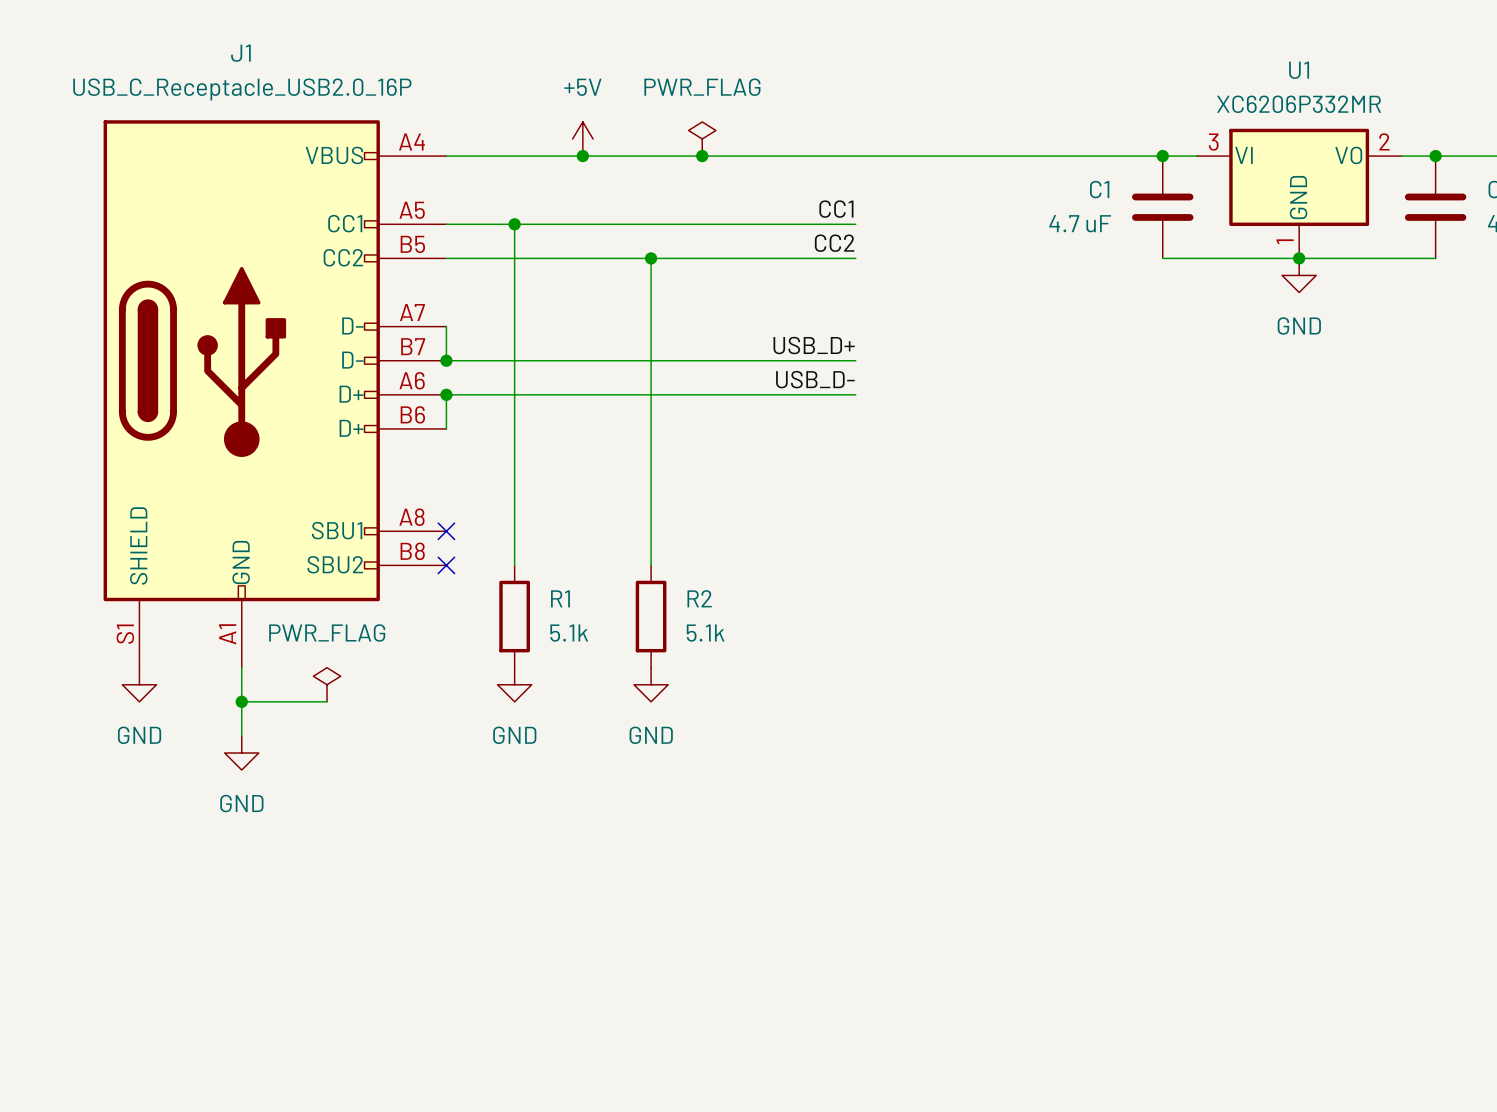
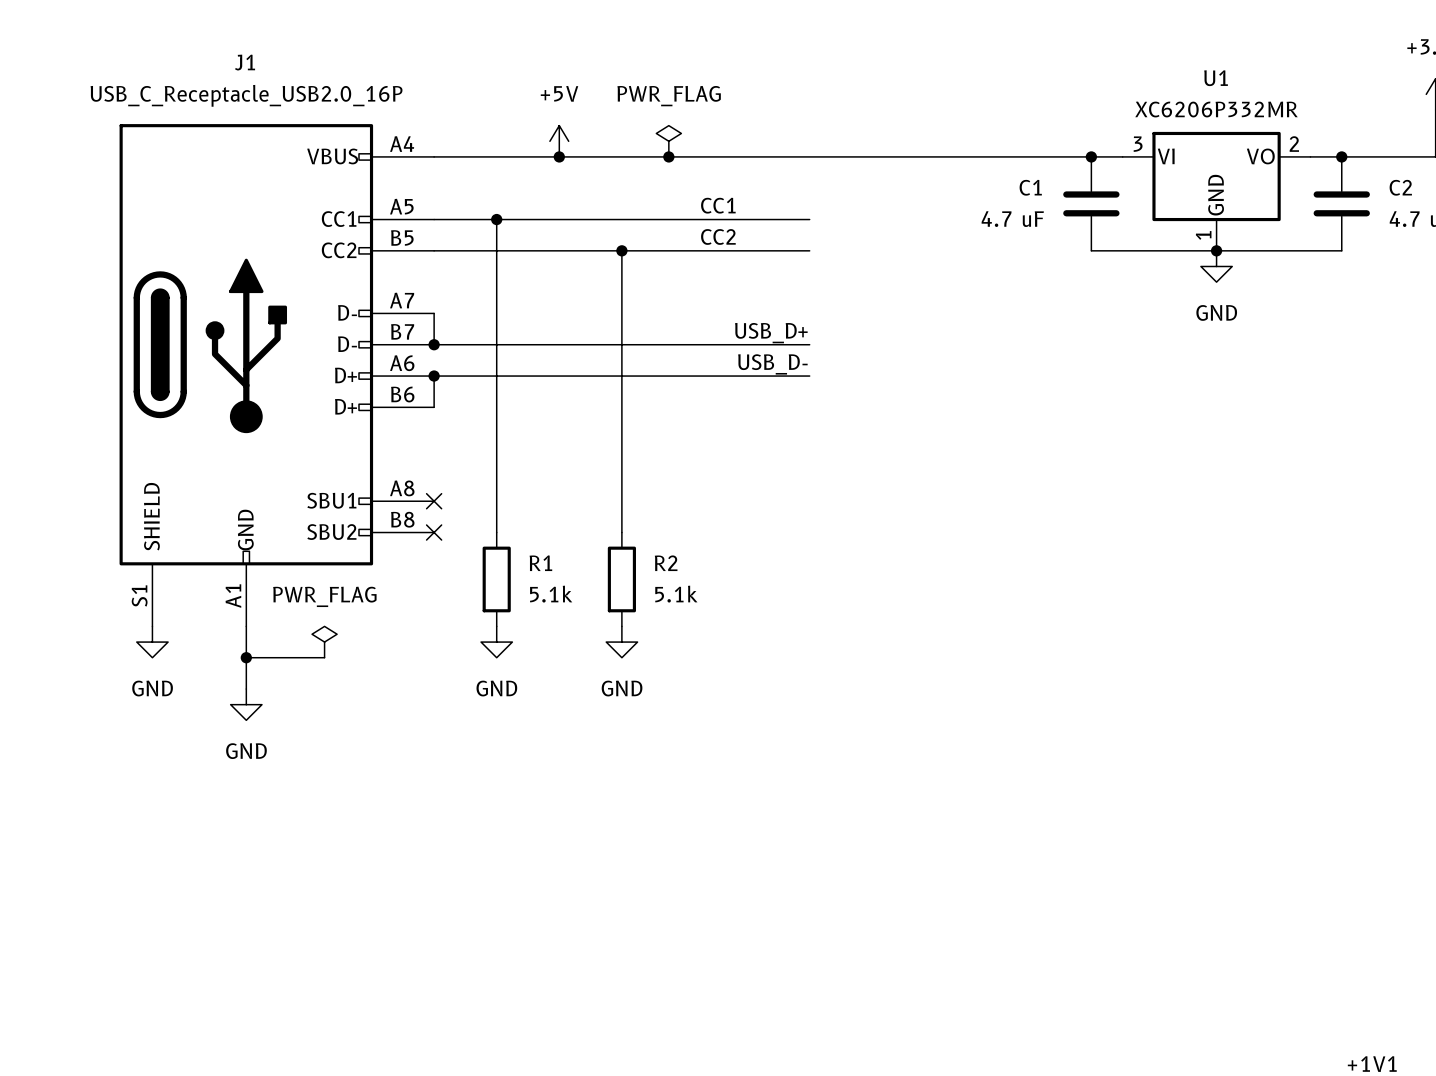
label position: CC1 (836, 209) -> CC1 (718, 205)
label position: CC2 (834, 243) -> CC2 (718, 236)

